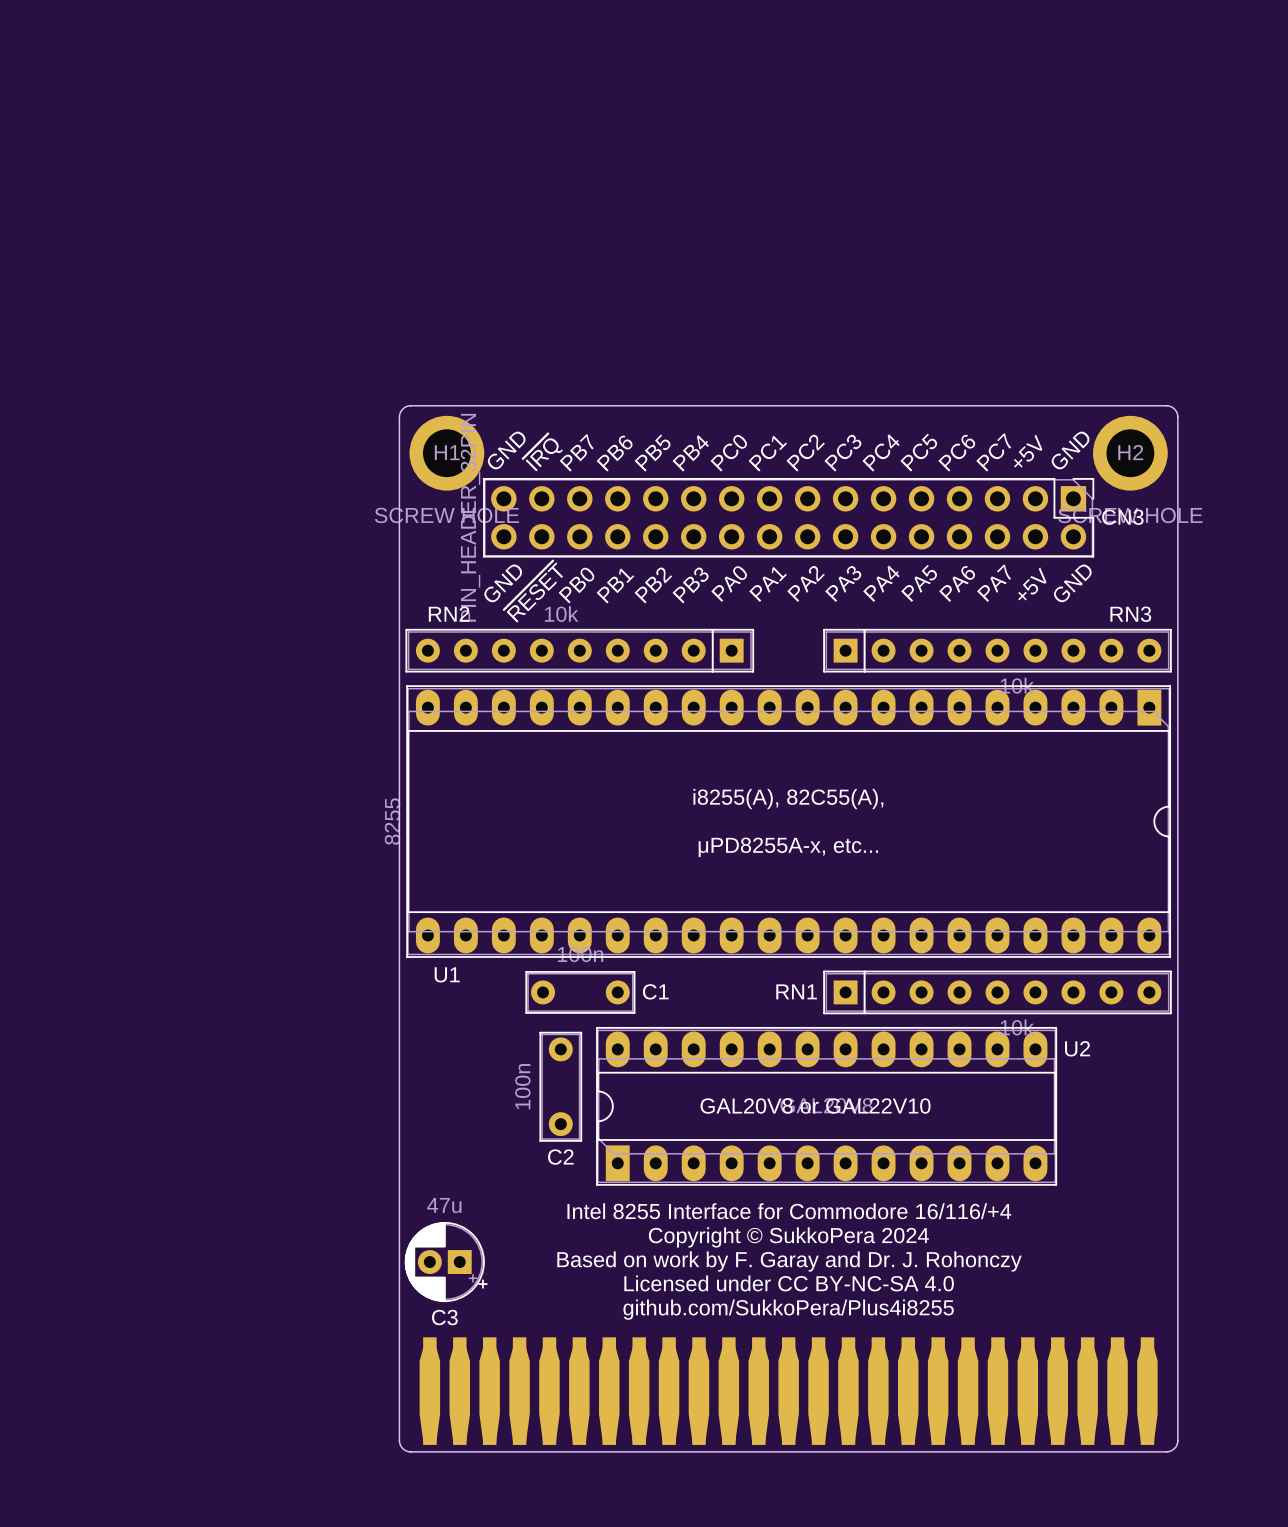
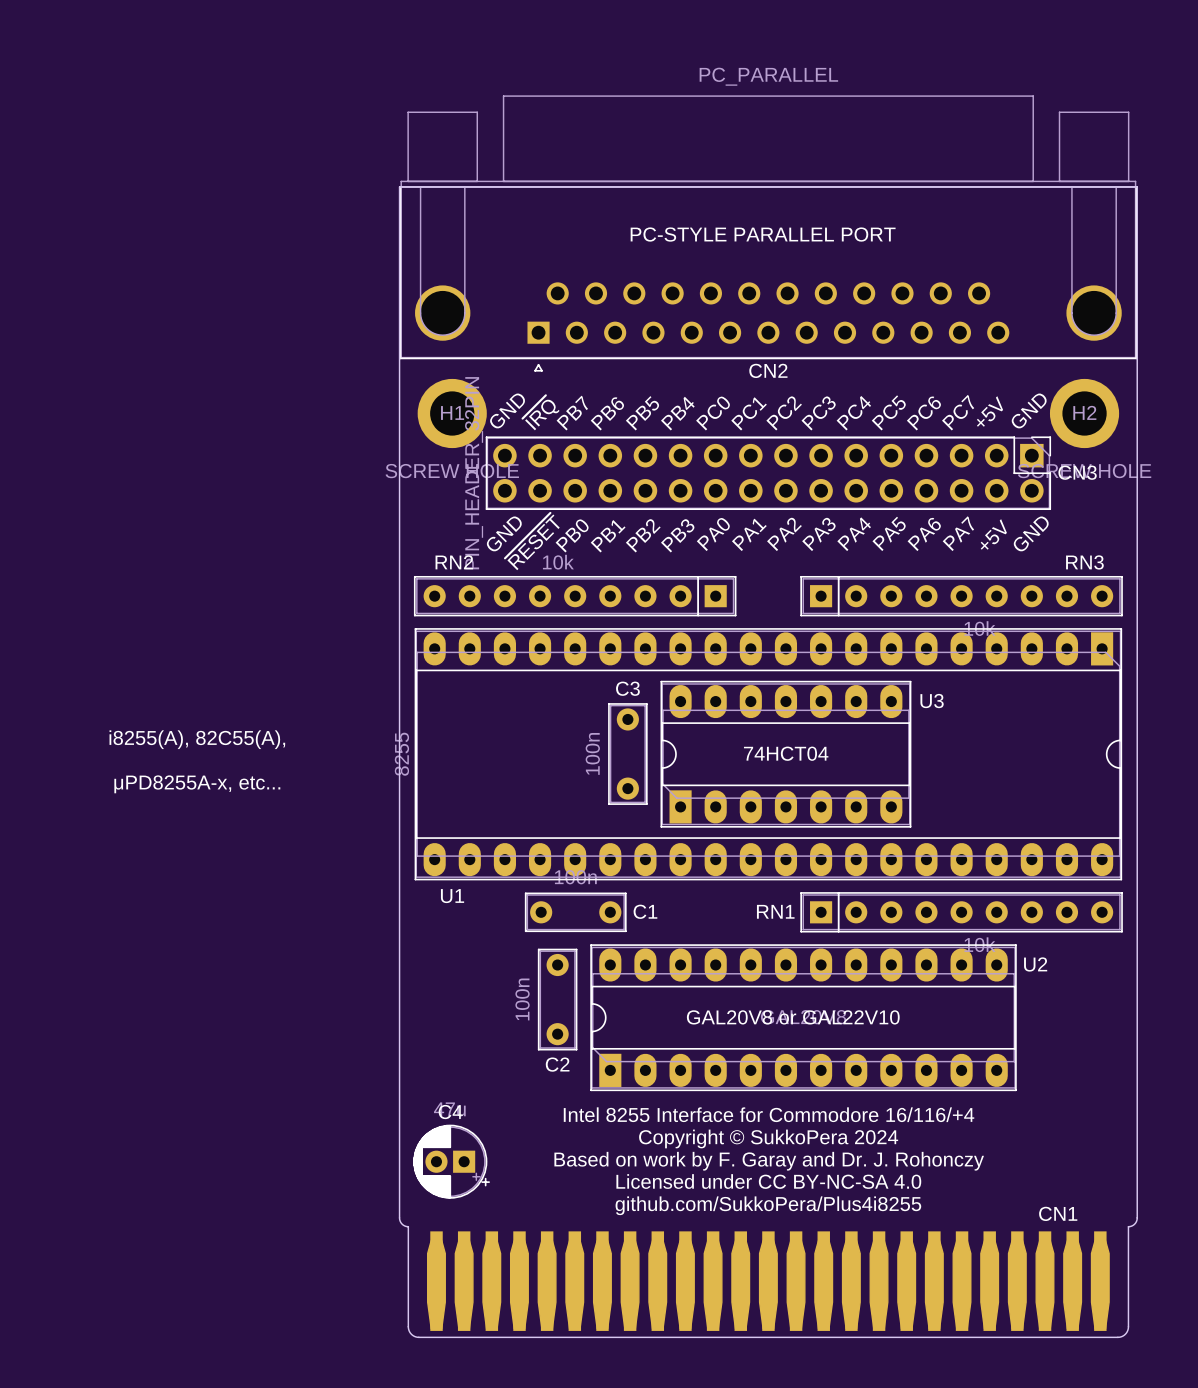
CN2: none -> PC_PARALLEL (768, 233)
text: none -> PC-STYLE PARALLEL PORT (763, 234)
text: i8255(A), 82C55(A), (788, 799) -> none
text: none -> i8255(A), 82C55(A), (197, 739)
C3: none -> 100n (627, 754)
U3: none -> 74HCT04 (785, 754)
text: μPD8255A-x, etc... (788, 847) -> none
text: none -> μPD8255A-x, etc... (197, 784)
C3 name: C3 (444, 1317) -> C4 (450, 1112)
CN1 name: none -> CN1 (1058, 1213)
board edge: (1177, 1332) (1177, 417) (1175, 410) (1166, 405) (409, 405) (402, 409) (399, 417) (399, 1440) -> (1128, 1226) (1134, 1224) (1137, 1217) (1137, 186) (399, 186) (399, 1217) (402, 1224) (408, 1226) (408, 1326)

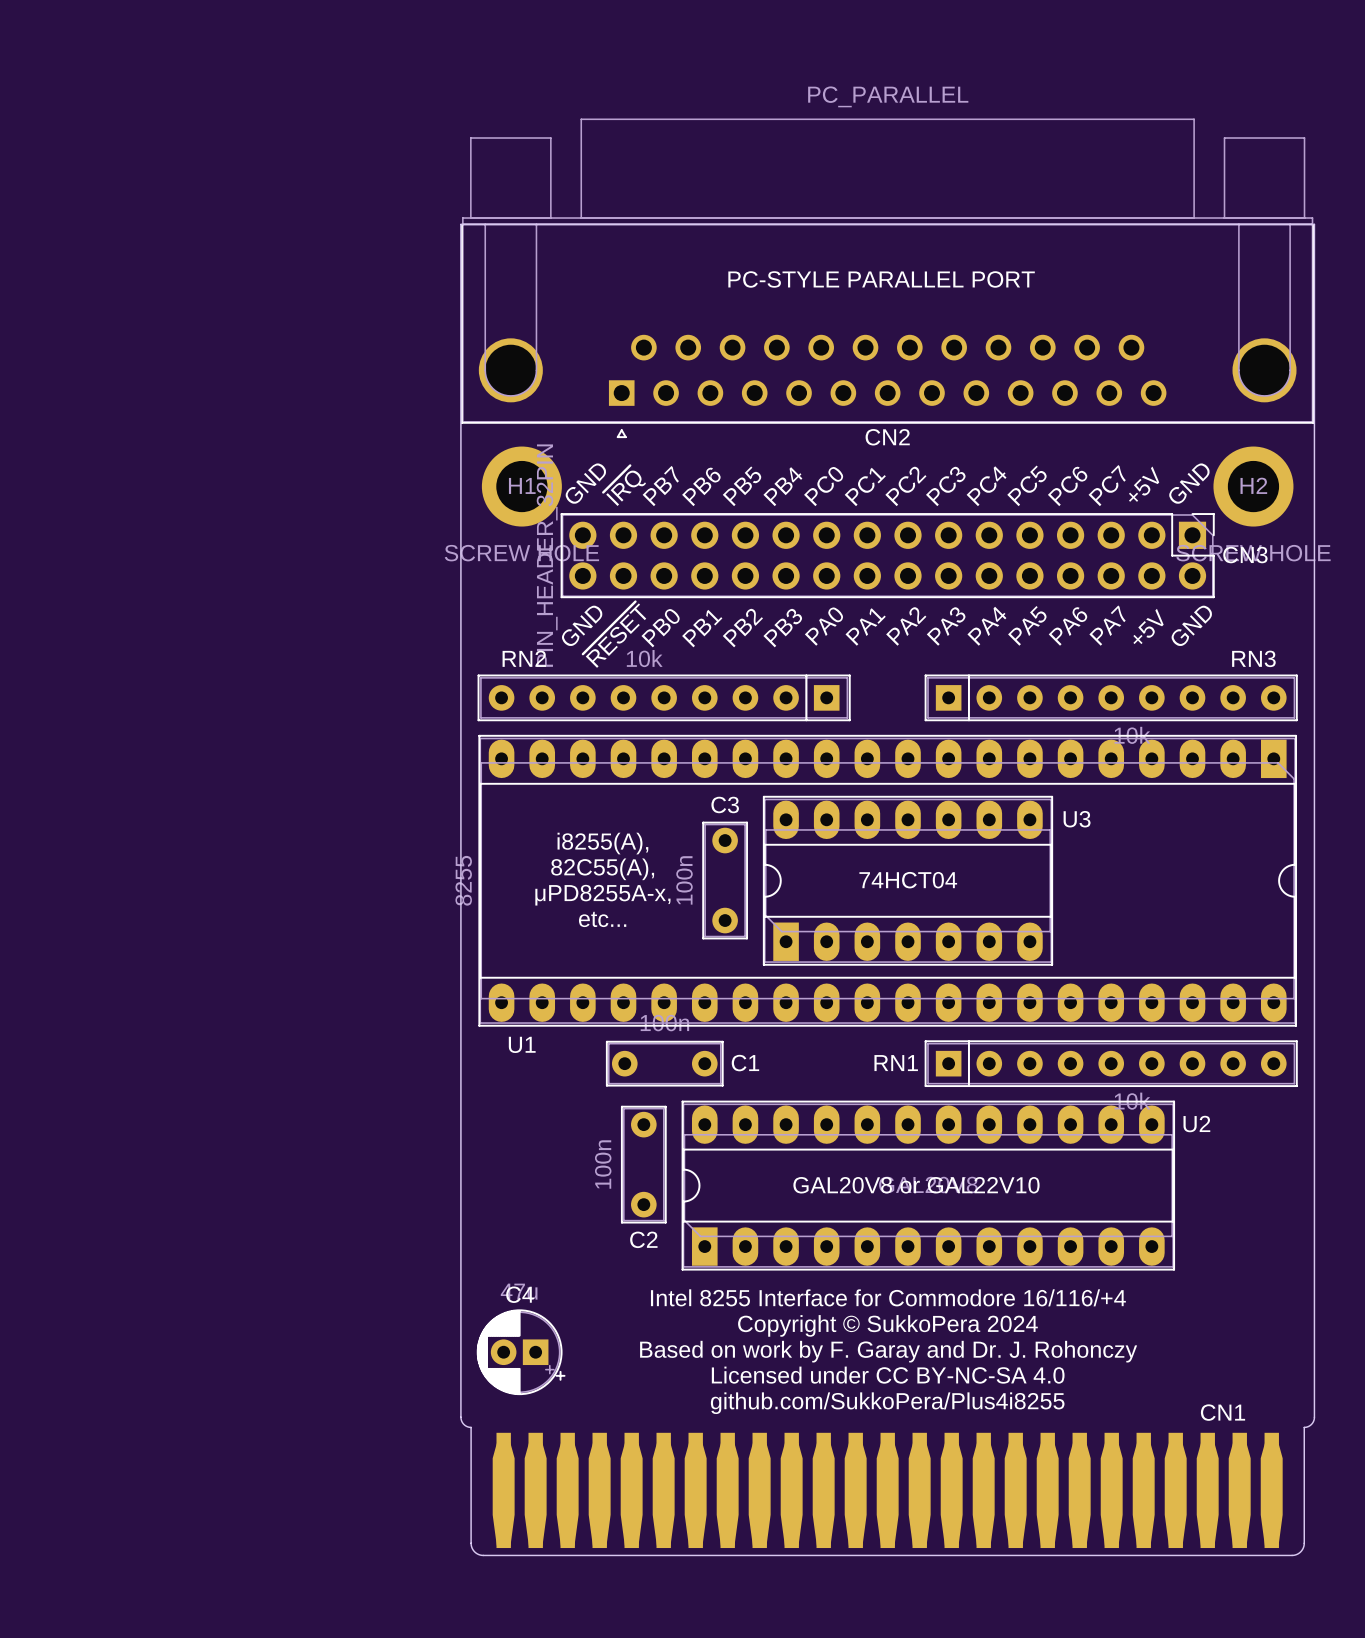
text: none -> i8255(A), (602, 843)
text: i8255(A), 82C55(A), (197, 739) -> none
text: none -> 82C55(A), (602, 869)
text: none -> μPD8255A-x, (602, 895)
text: μPD8255A-x, etc... (197, 784) -> none
text: none -> etc... (602, 919)

